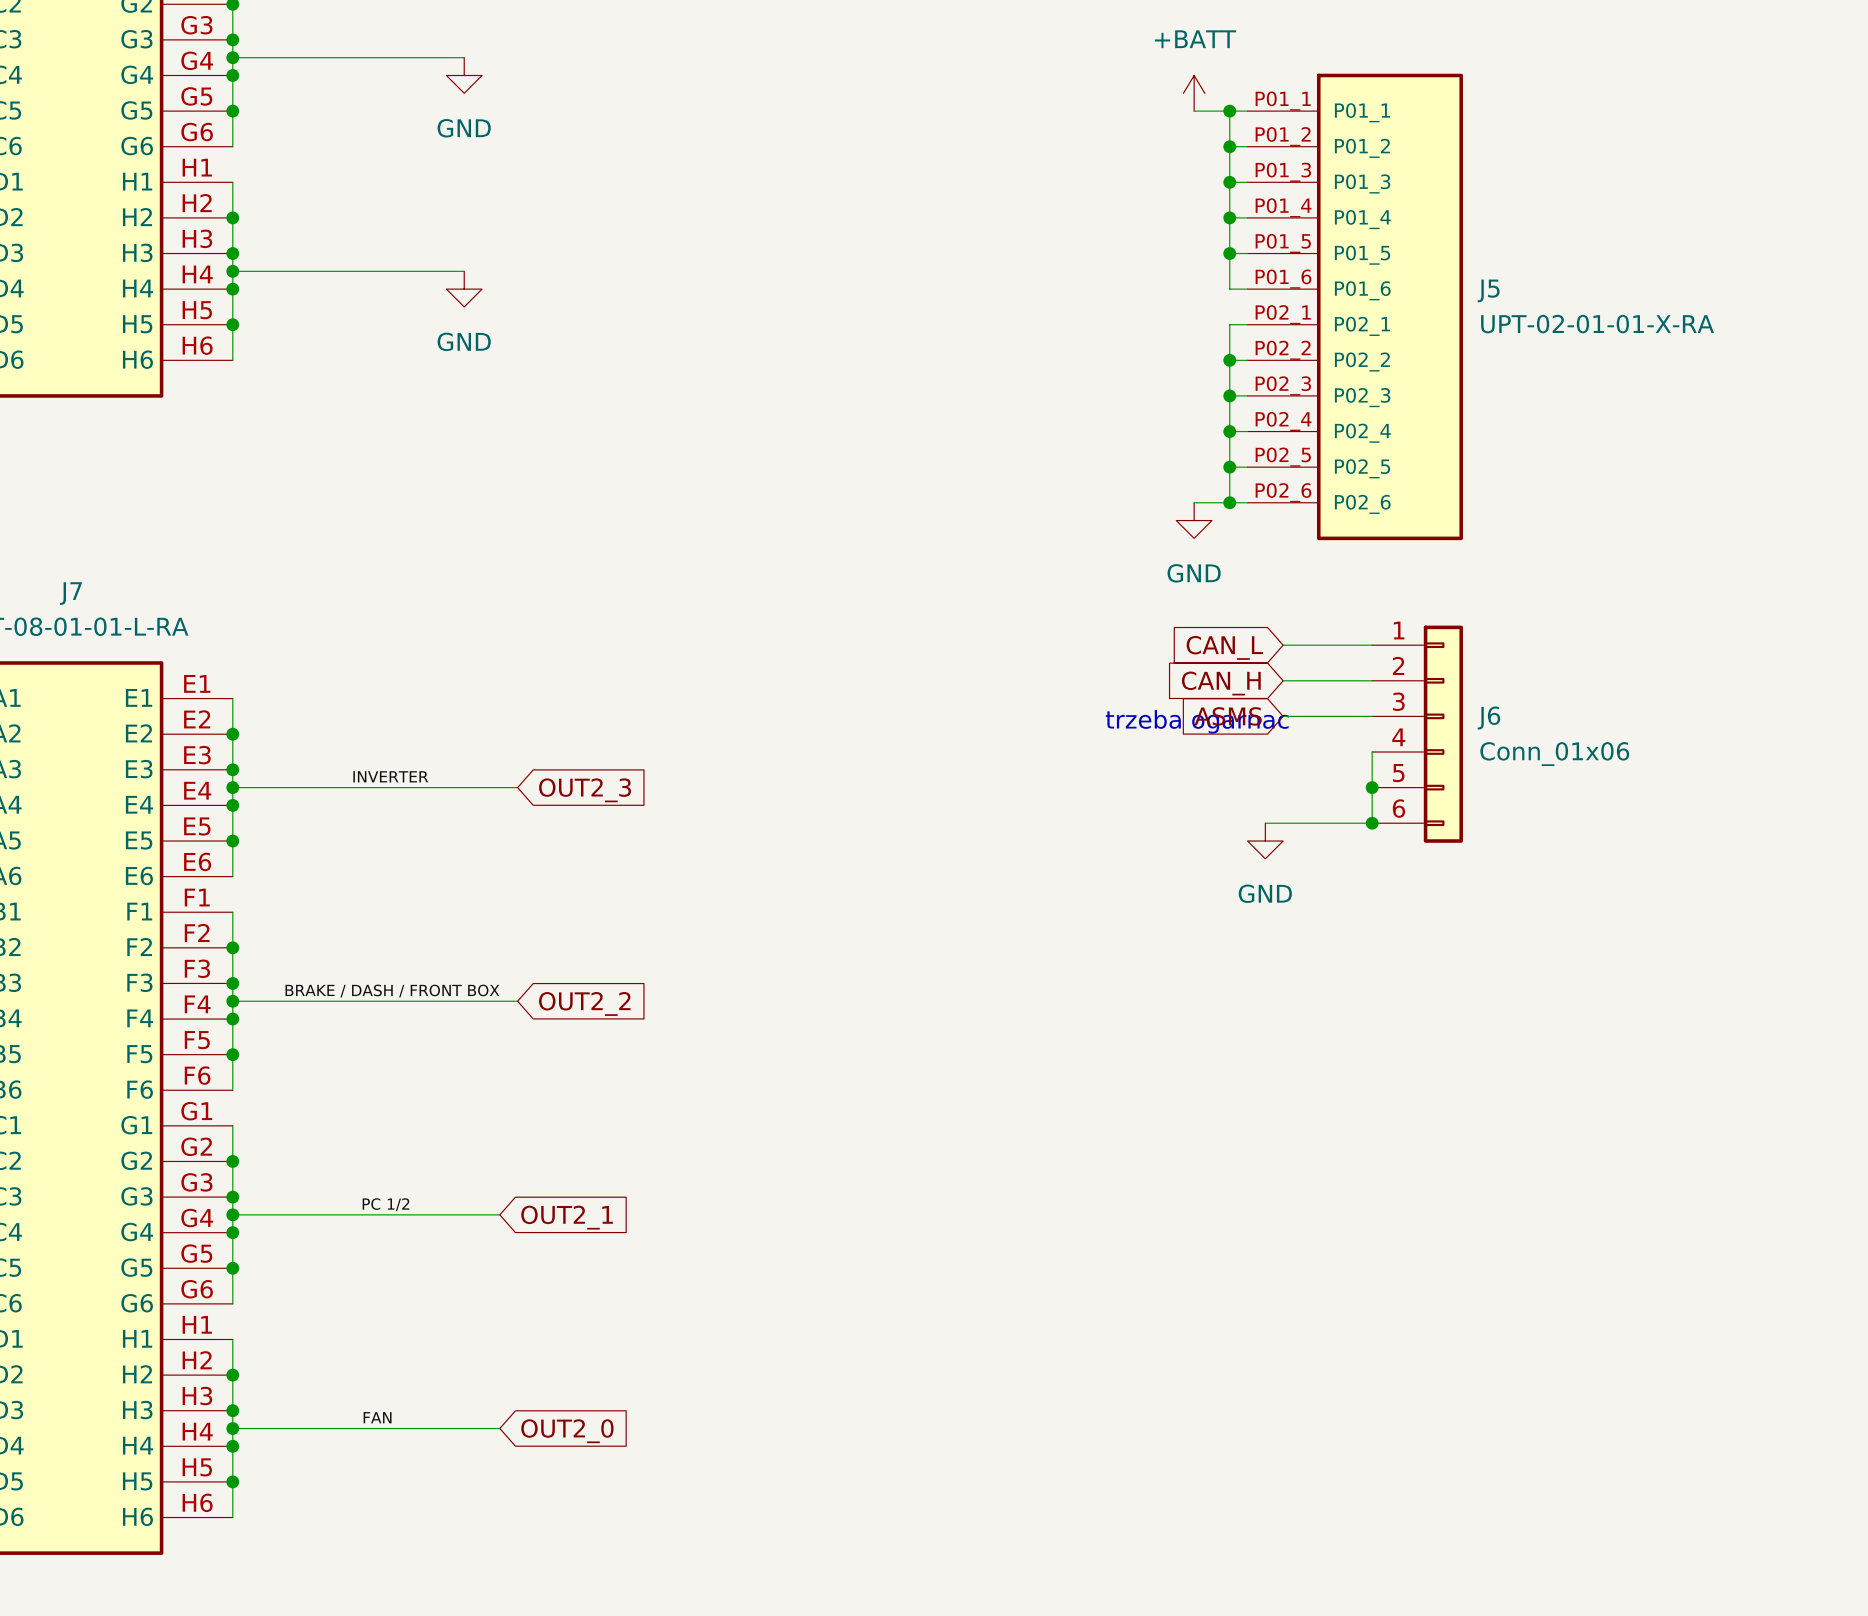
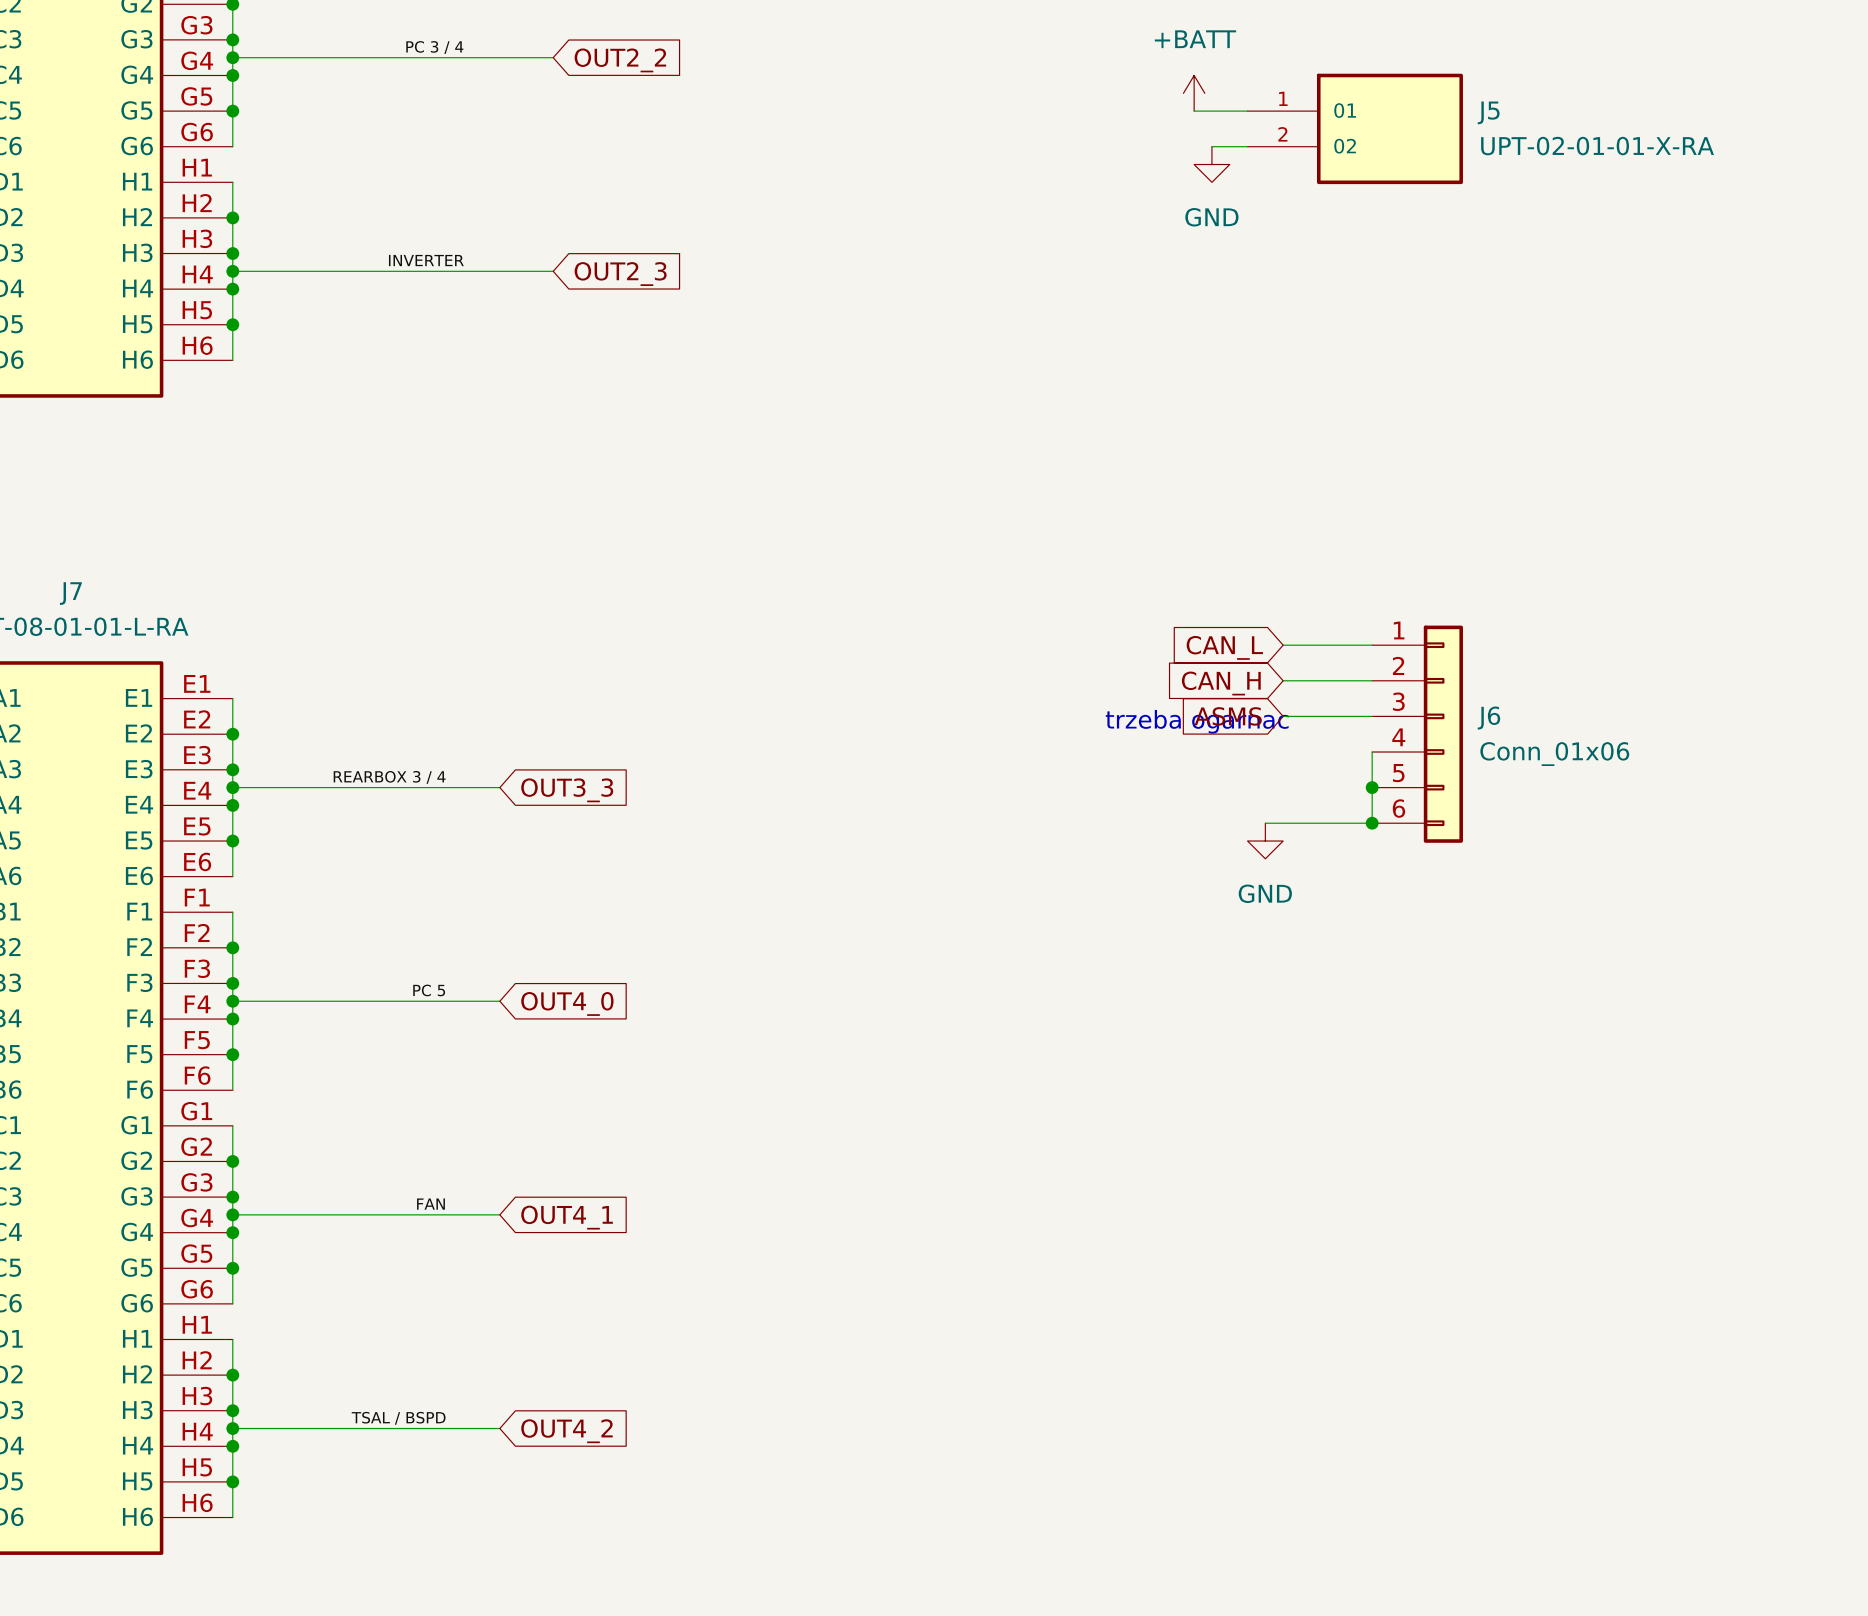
label: none -> PC 3 / 4 (434, 47)
wire: none -> (464, 57) (553, 57)
global label: none -> OUT2_2 (620, 60)
J5 symbol: [1247, 73, 1463, 541] -> [1247, 73, 1463, 185]
power symbol: GND (464, 75) -> none
wire: (1229, 111) (1229, 289) (1247, 289) -> none
junction: (1229, 111) -> none
junction: (1229, 146) -> none
power symbol: none -> GND (1211, 164)
wire: (1229, 182) (1247, 182) -> (1211, 146) (1229, 146)
junction: (1229, 182) -> none
wire: (1229, 217) (1247, 217) -> none
junction: (1229, 217) -> none
wire: (1229, 253) (1247, 253) -> none
junction: (1229, 253) -> none
label: none -> INVERTER (426, 260)
wire: none -> (464, 271) (553, 271)
global label: none -> OUT2_3 (620, 274)
power symbol: GND (464, 289) -> none
wire: (1247, 324) (1229, 324) (1229, 502) -> none
wire: (1229, 360) (1247, 360) -> none
junction: (1229, 360) -> none
wire: (1229, 395) (1247, 395) -> none
junction: (1229, 395) -> none
wire: (1229, 431) (1247, 431) -> none
junction: (1229, 431) -> none
wire: (1229, 467) (1247, 467) -> none
junction: (1229, 467) -> none
wire: (1194, 502) (1247, 502) -> none
junction: (1229, 502) -> none
power symbol: GND (1194, 520) -> none
label: INVERTER (390, 776) -> none
label: none -> REARBOX 3 / 4 (389, 777)
wire: (499, 787) (517, 787) -> none
global label: OUT2_3 (585, 790) -> OUT3_3 (567, 790)
label: none -> PC 5 (429, 990)
label: BRAKE / DASH / FRONT BOX (392, 991) -> none
wire: (499, 1001) (517, 1001) -> none
global label: OUT2_2 (584, 1003) -> OUT4_0 (567, 1003)
label: PC 1/2 (385, 1204) -> none
global label: OUT2_1 (567, 1217) -> OUT4_1 (567, 1217)
label position: FAN (377, 1417) -> FAN (430, 1204)
label: none -> TSAL / BSPD (398, 1418)
global label: OUT2_0 (567, 1431) -> OUT4_2 (566, 1431)

